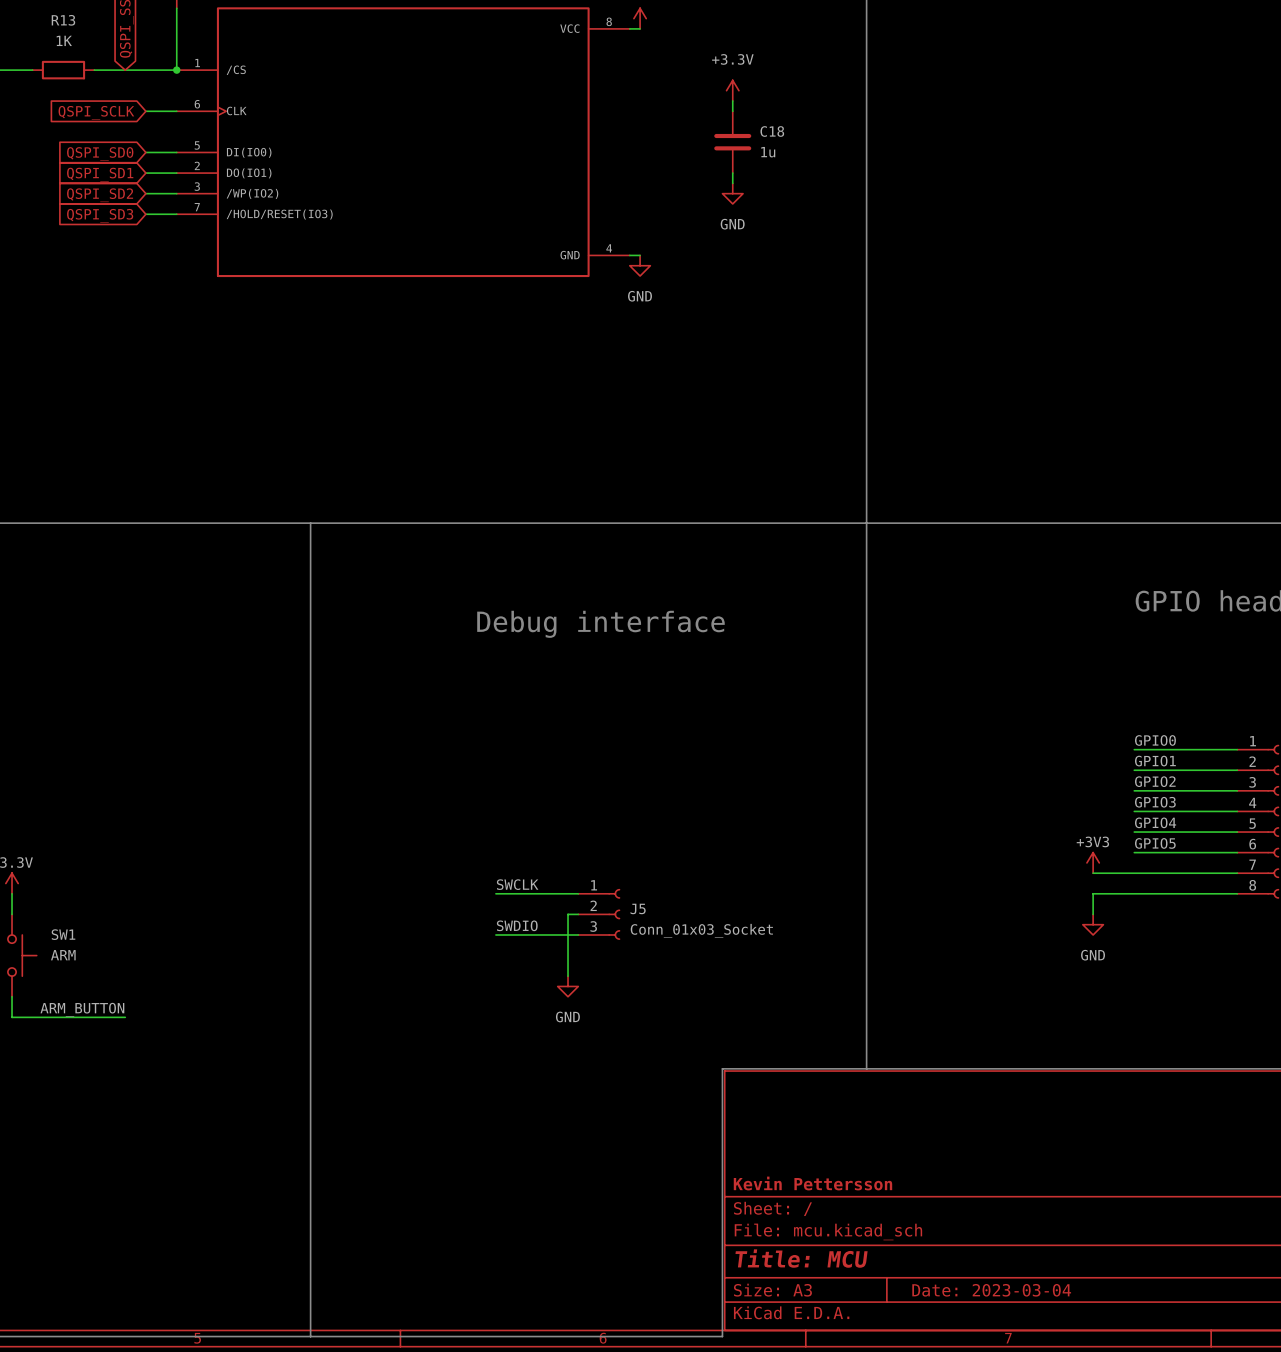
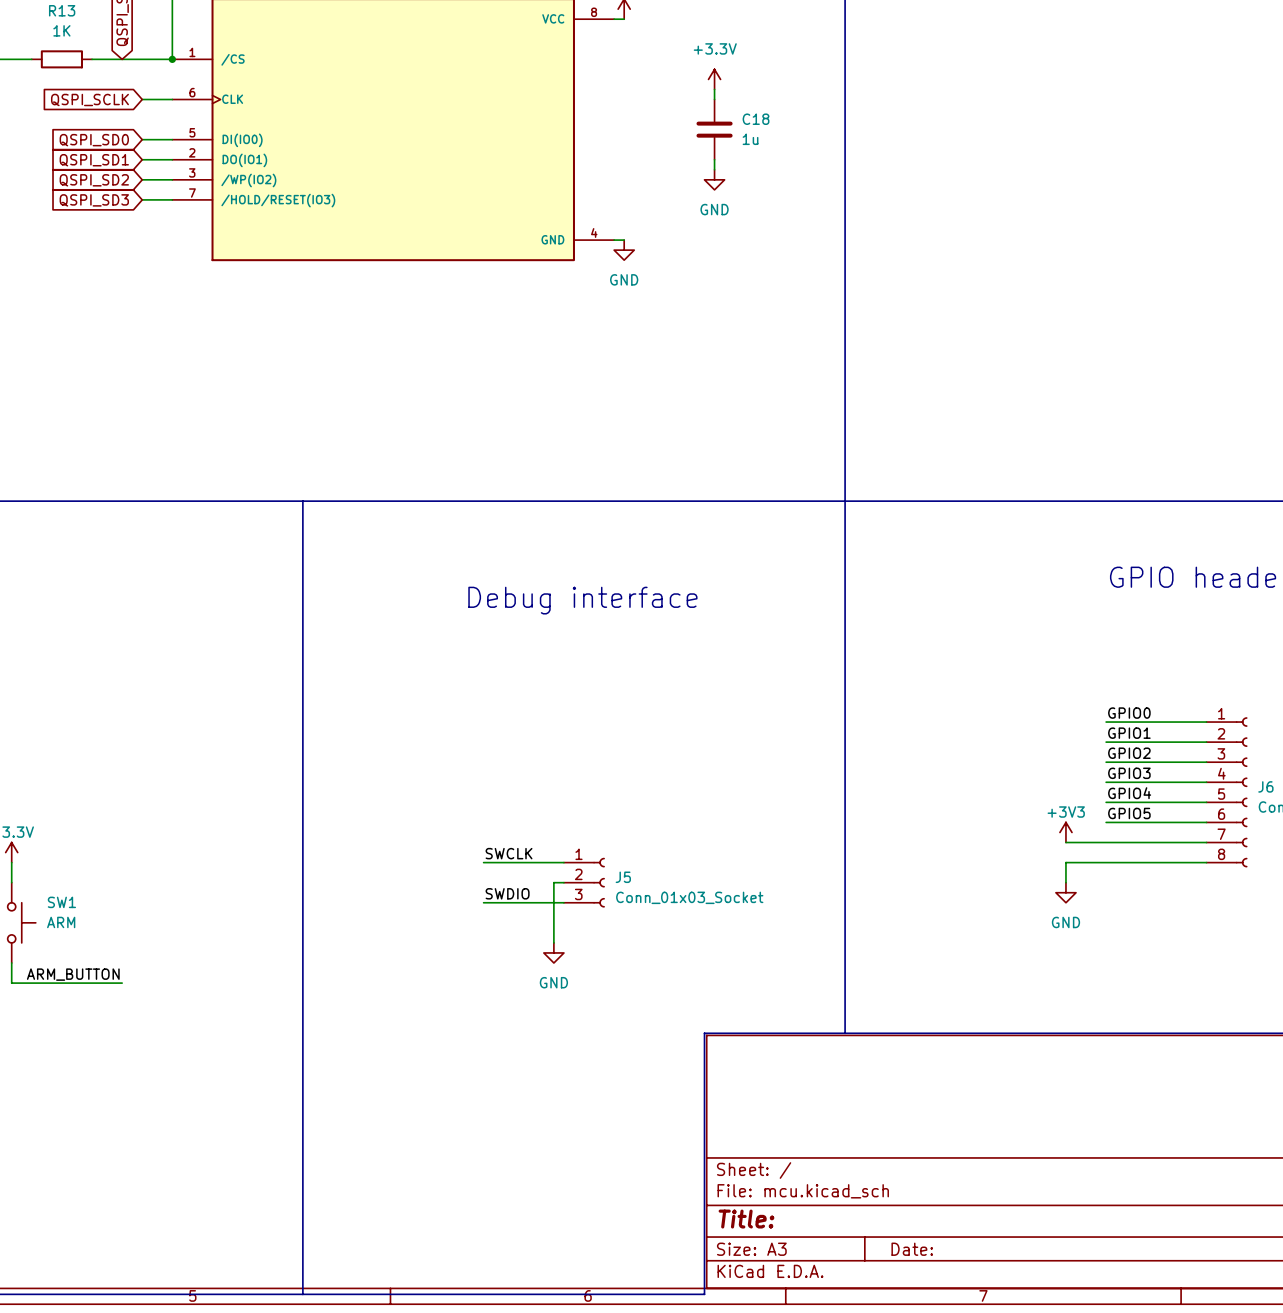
title block: Kevin Pettersson (812, 1183) -> none
title block: Title: MCU (801, 1258) -> Title: (746, 1219)
title block: Date: 2023-03-04 (991, 1290) -> Date: (912, 1249)

